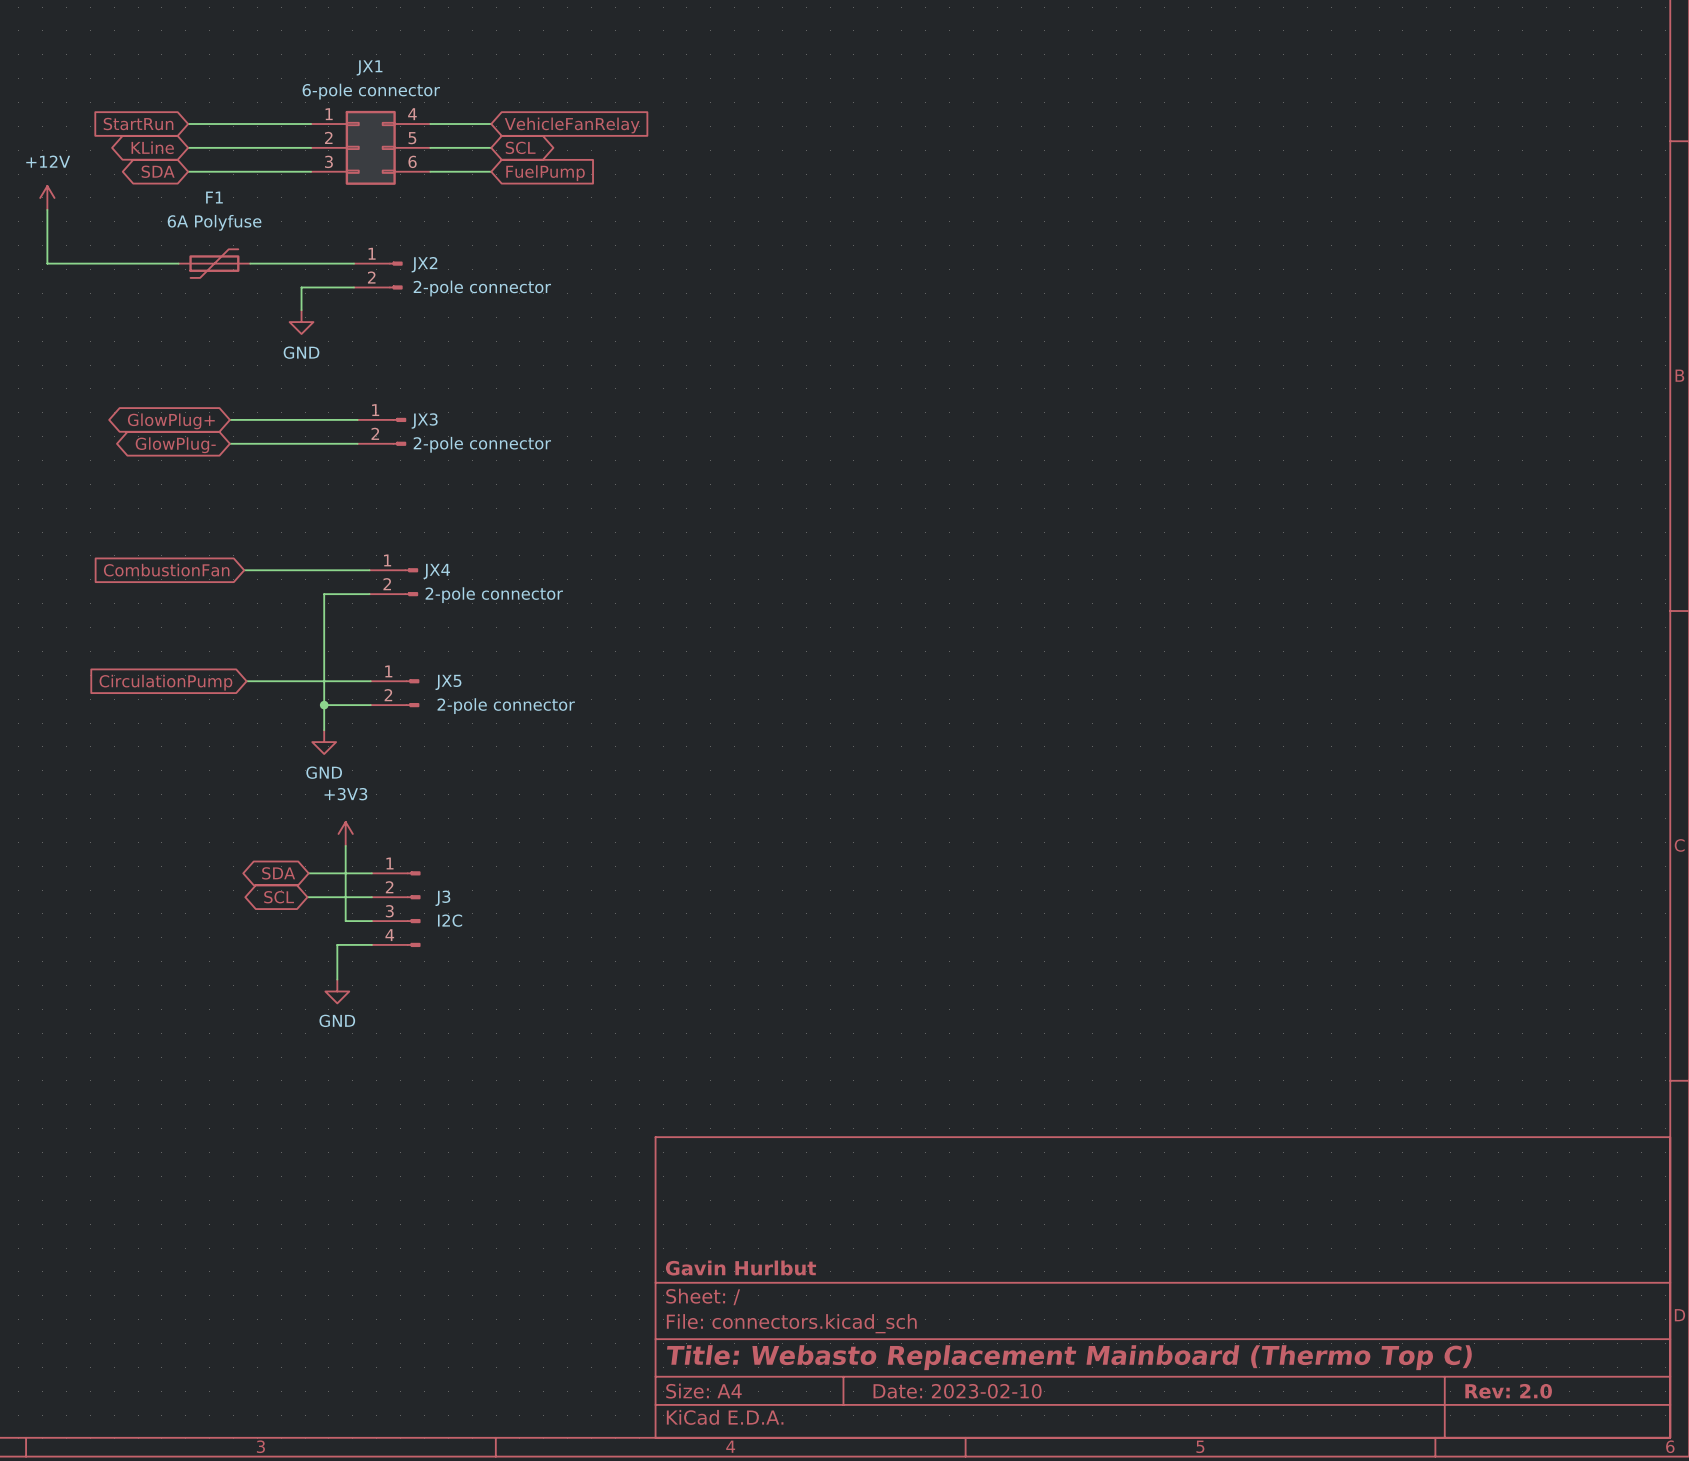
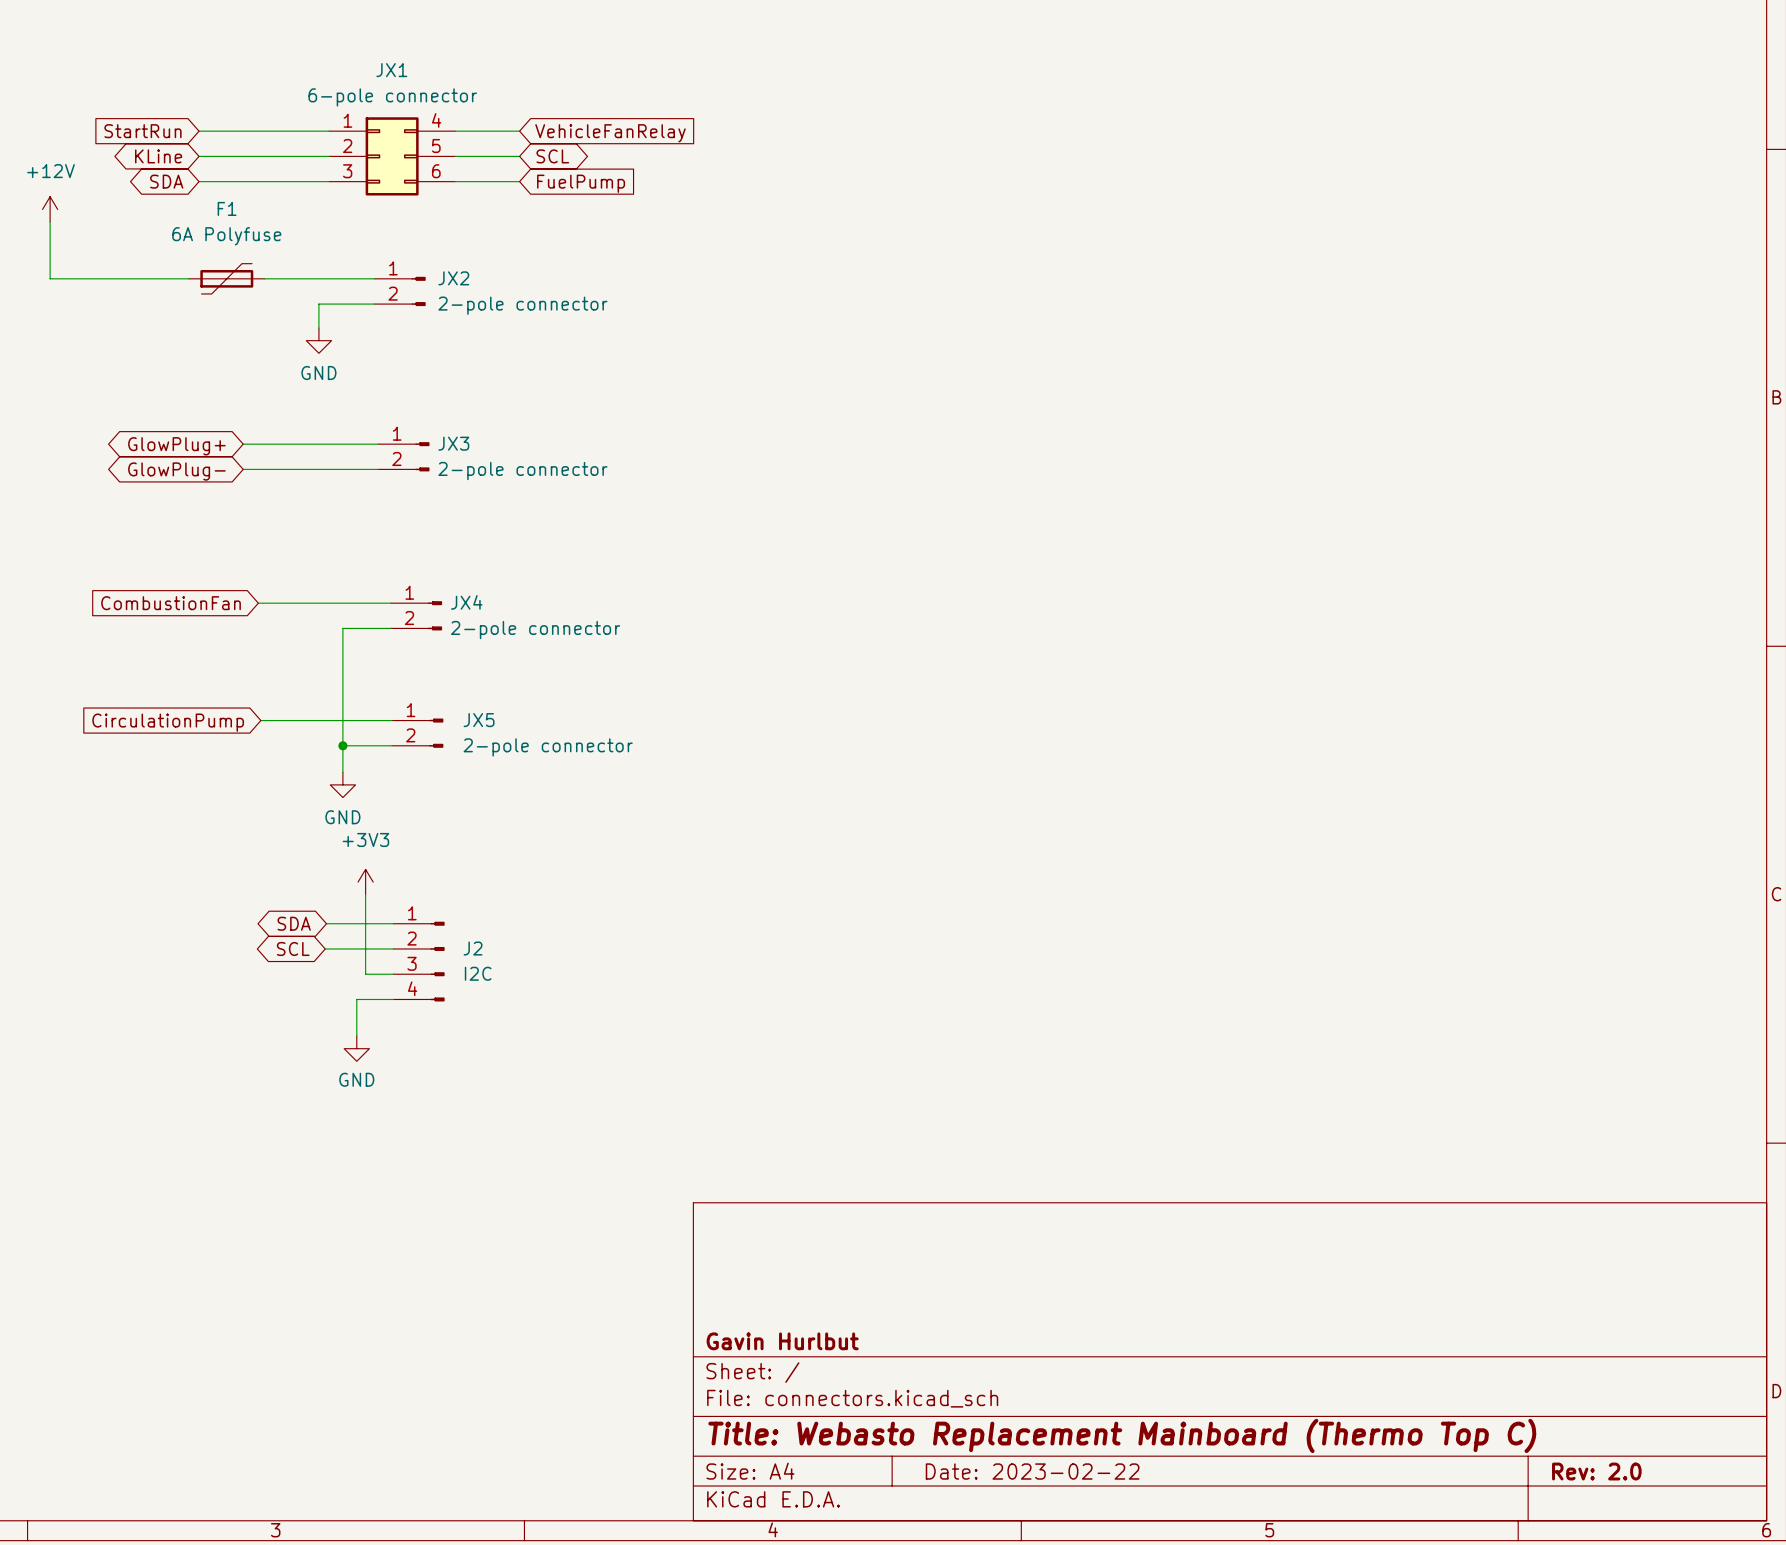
J3 name: J3 (442, 898) -> J2 (473, 948)
title block: Date: 2023-02-10 (957, 1391) -> Date: 2023-02-22 (1032, 1471)

